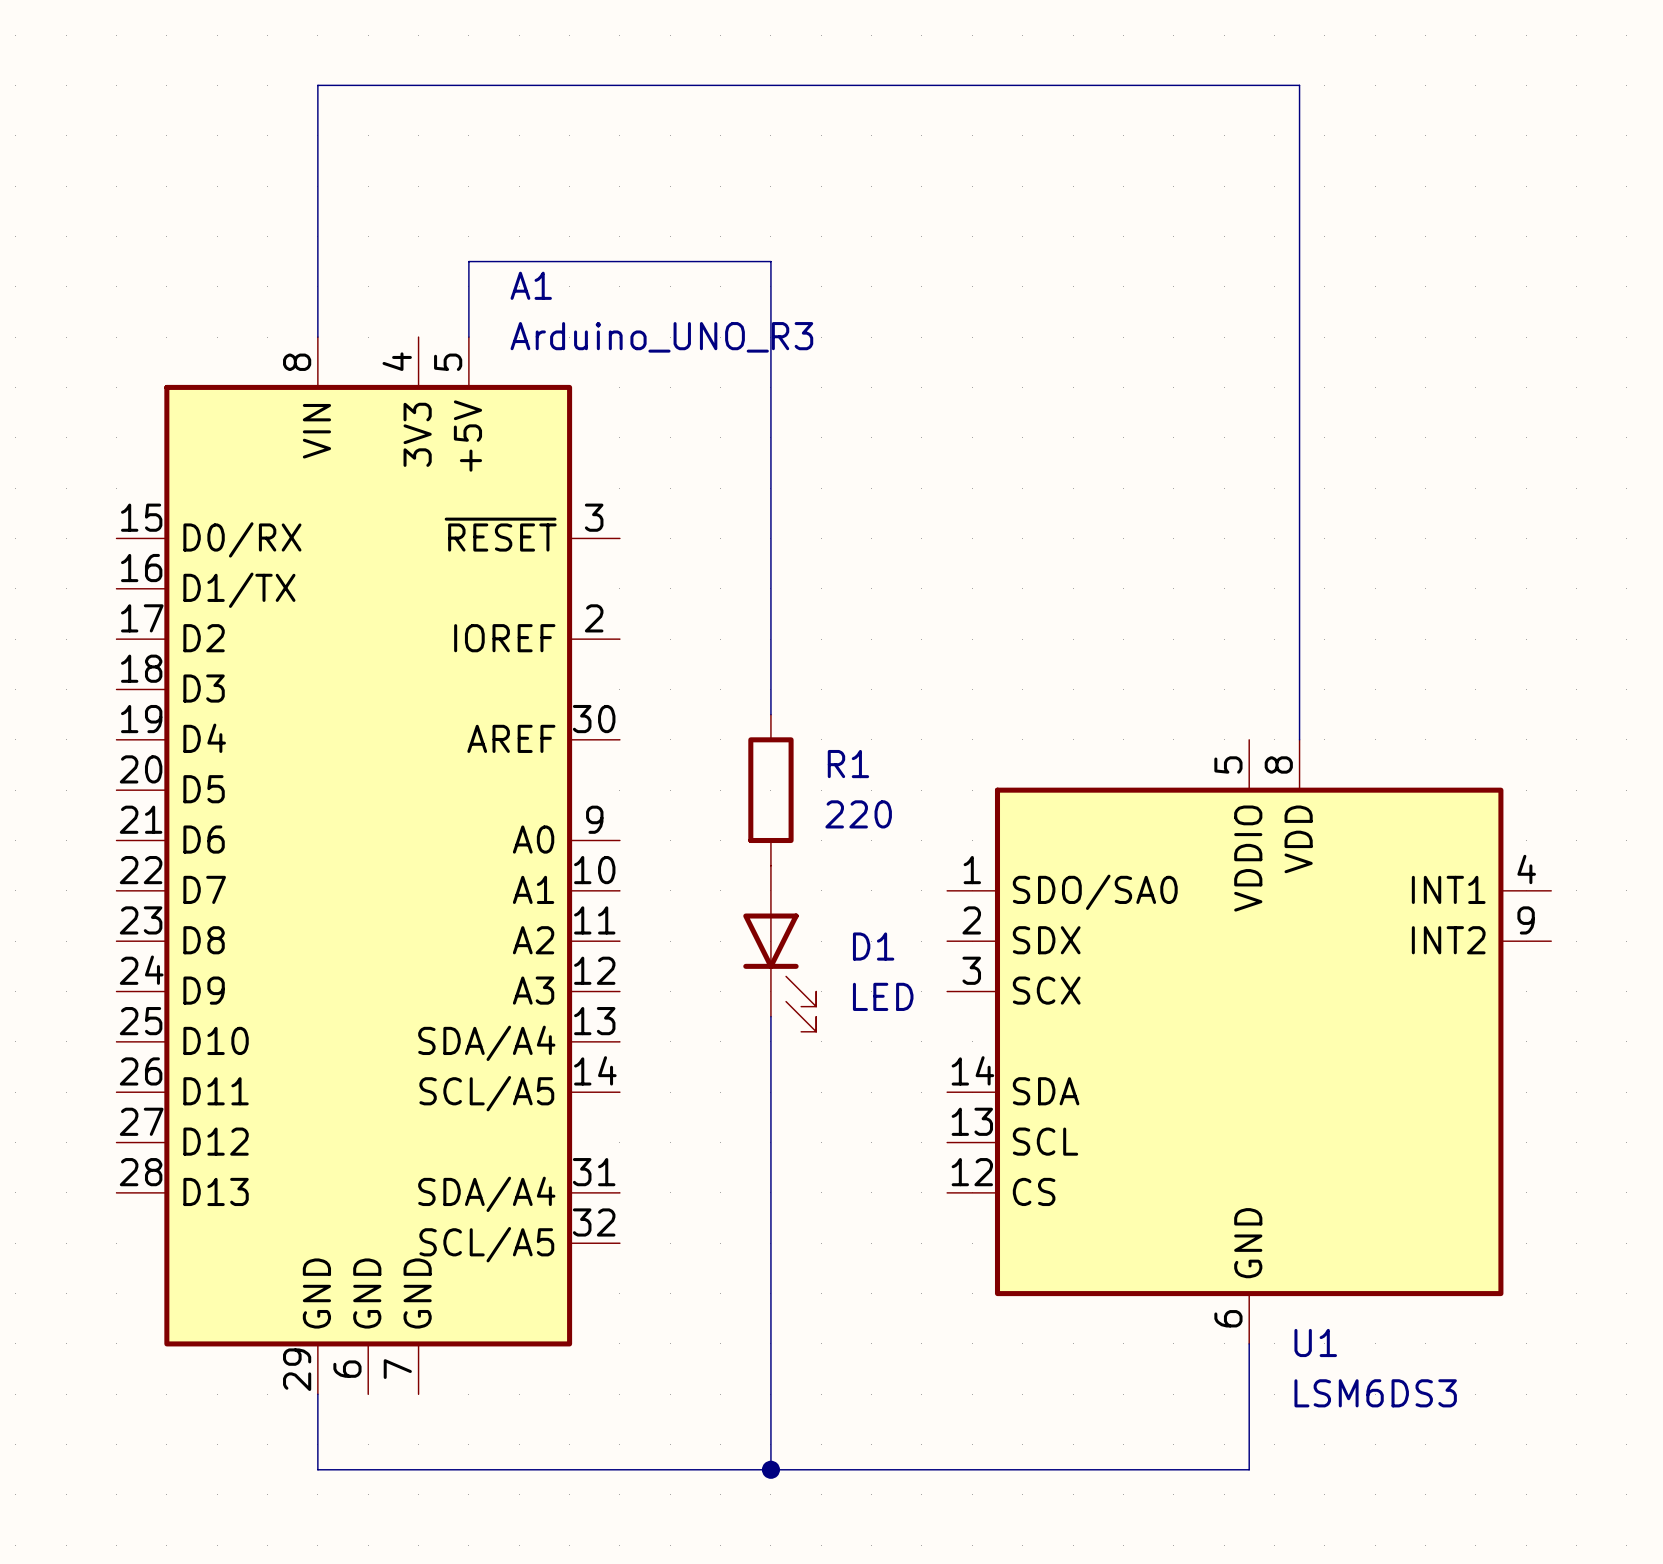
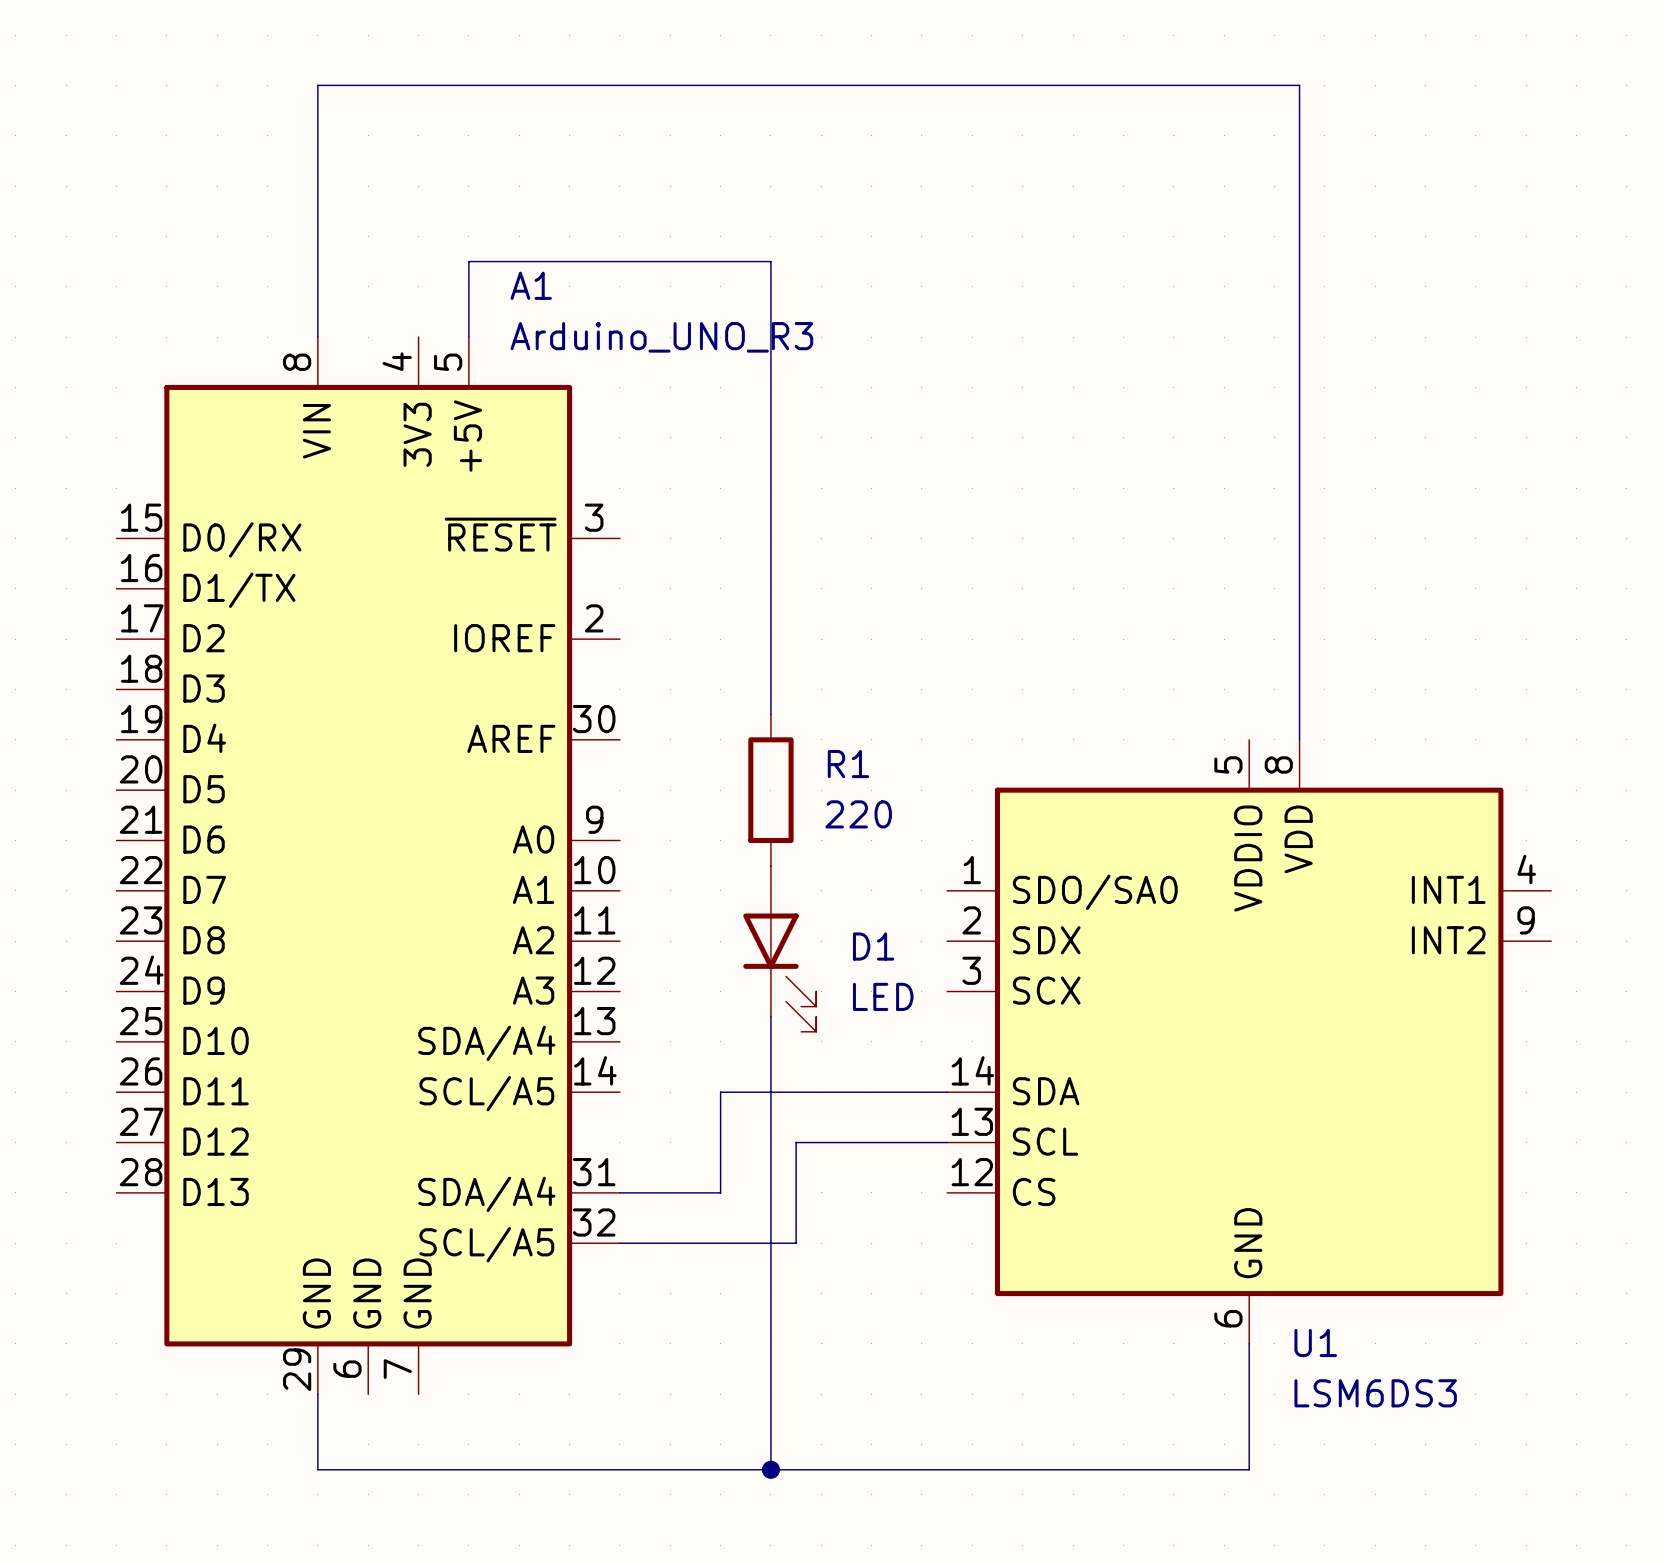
wire: none -> (947, 1092) (720, 1092) (720, 1192) (619, 1192)
wire: none -> (947, 1142) (796, 1142) (796, 1243) (619, 1243)

